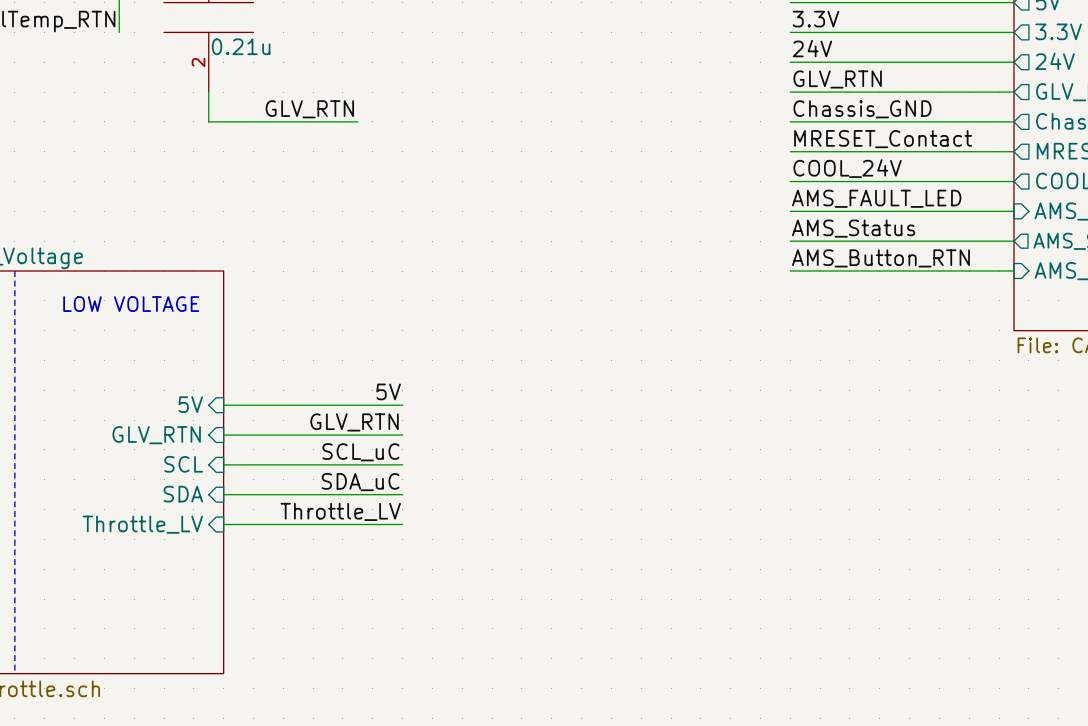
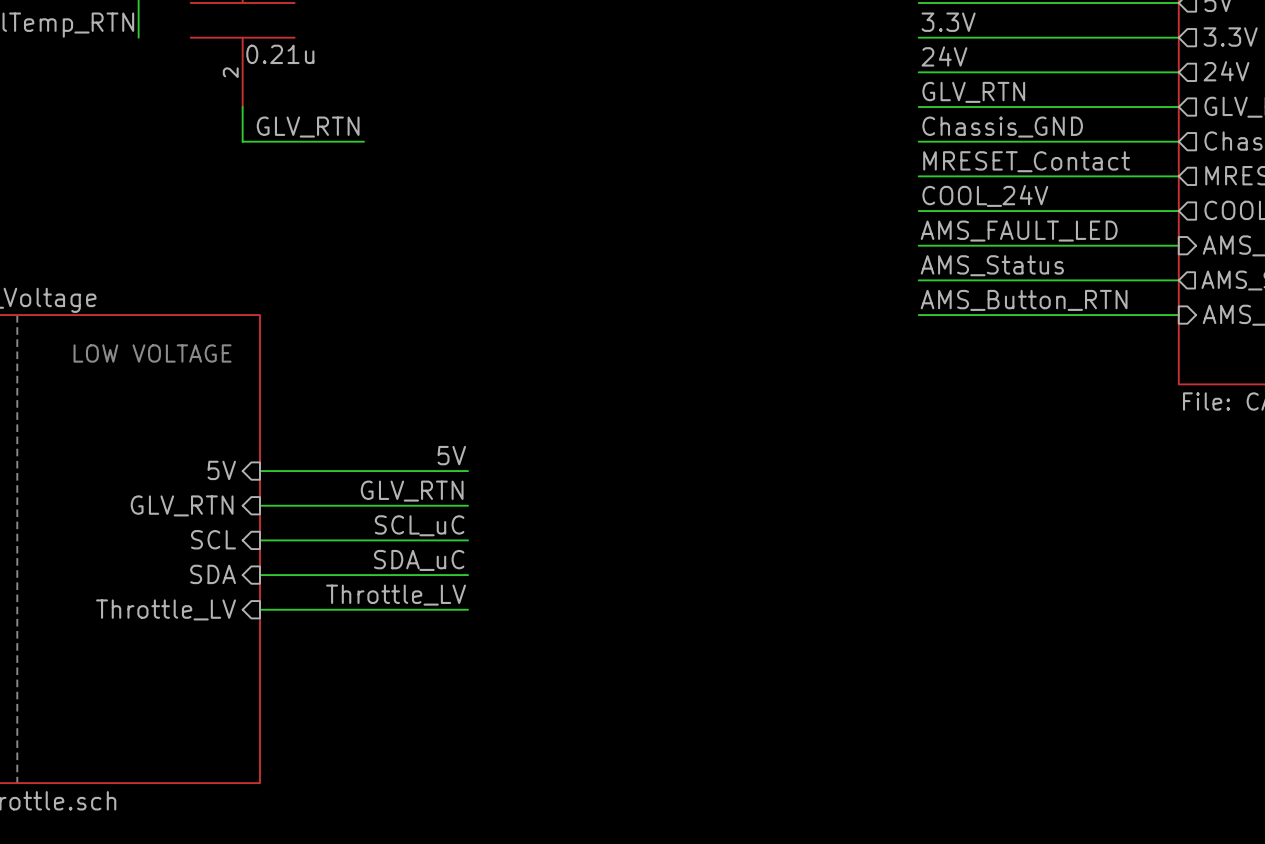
label position: GLV_RTN (309, 109) -> GLV_RTN (308, 127)
wire: (313, 121) (357, 121) -> none

